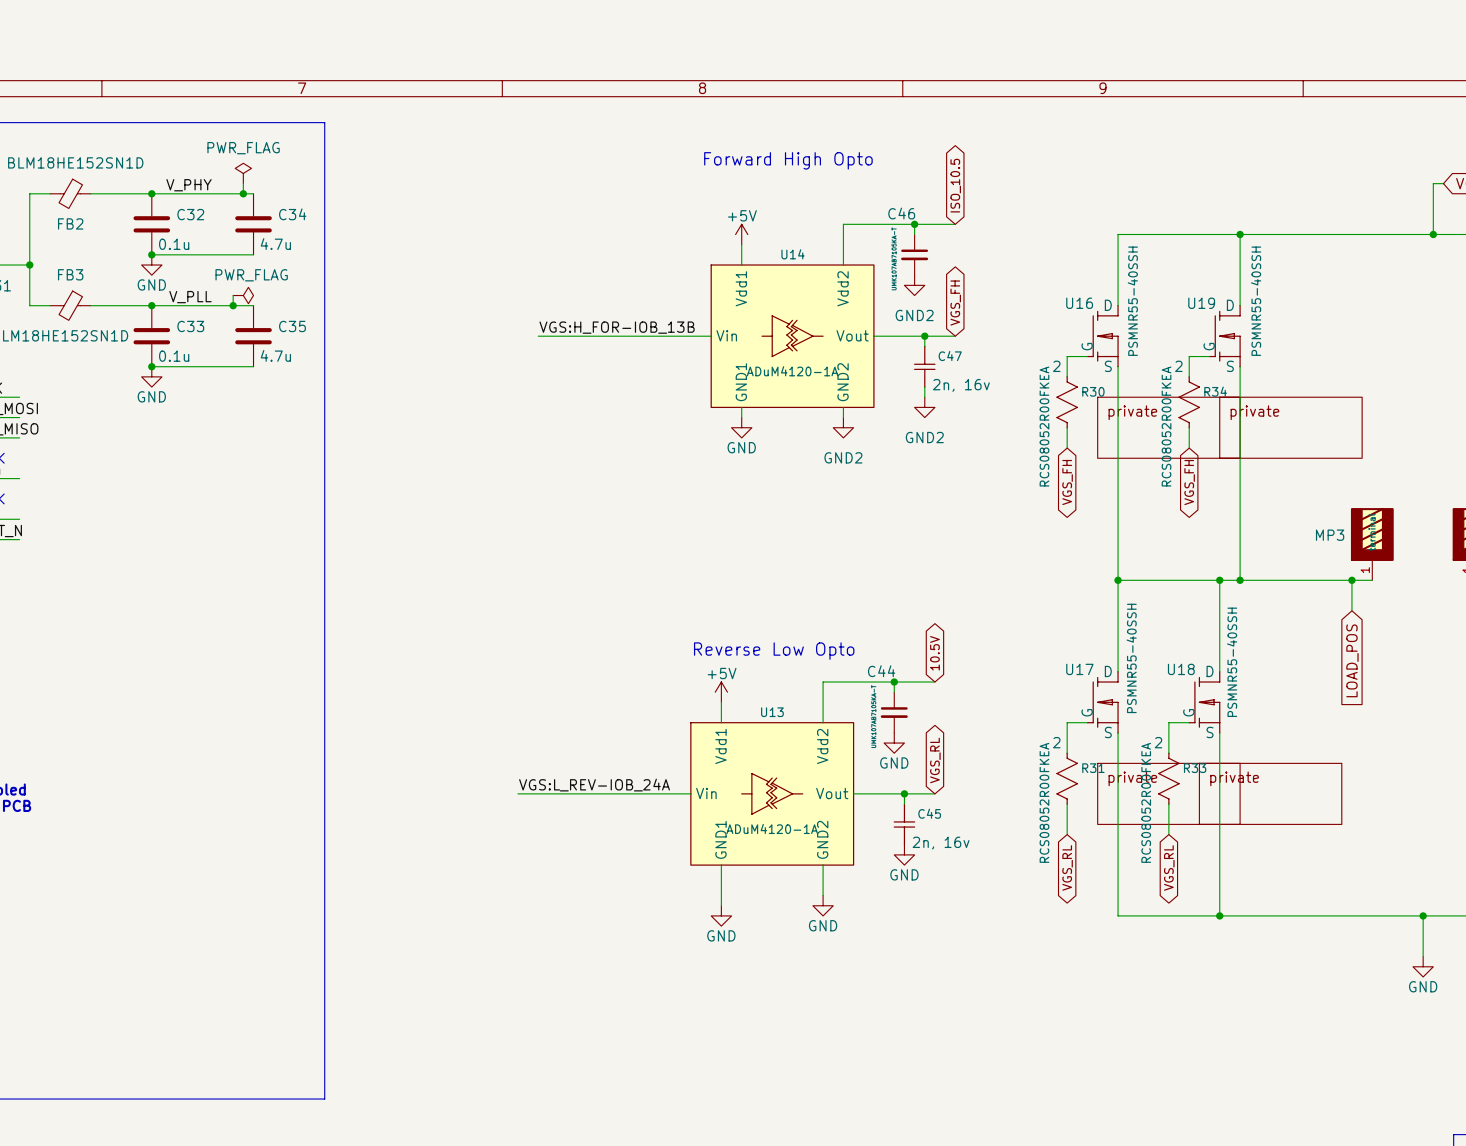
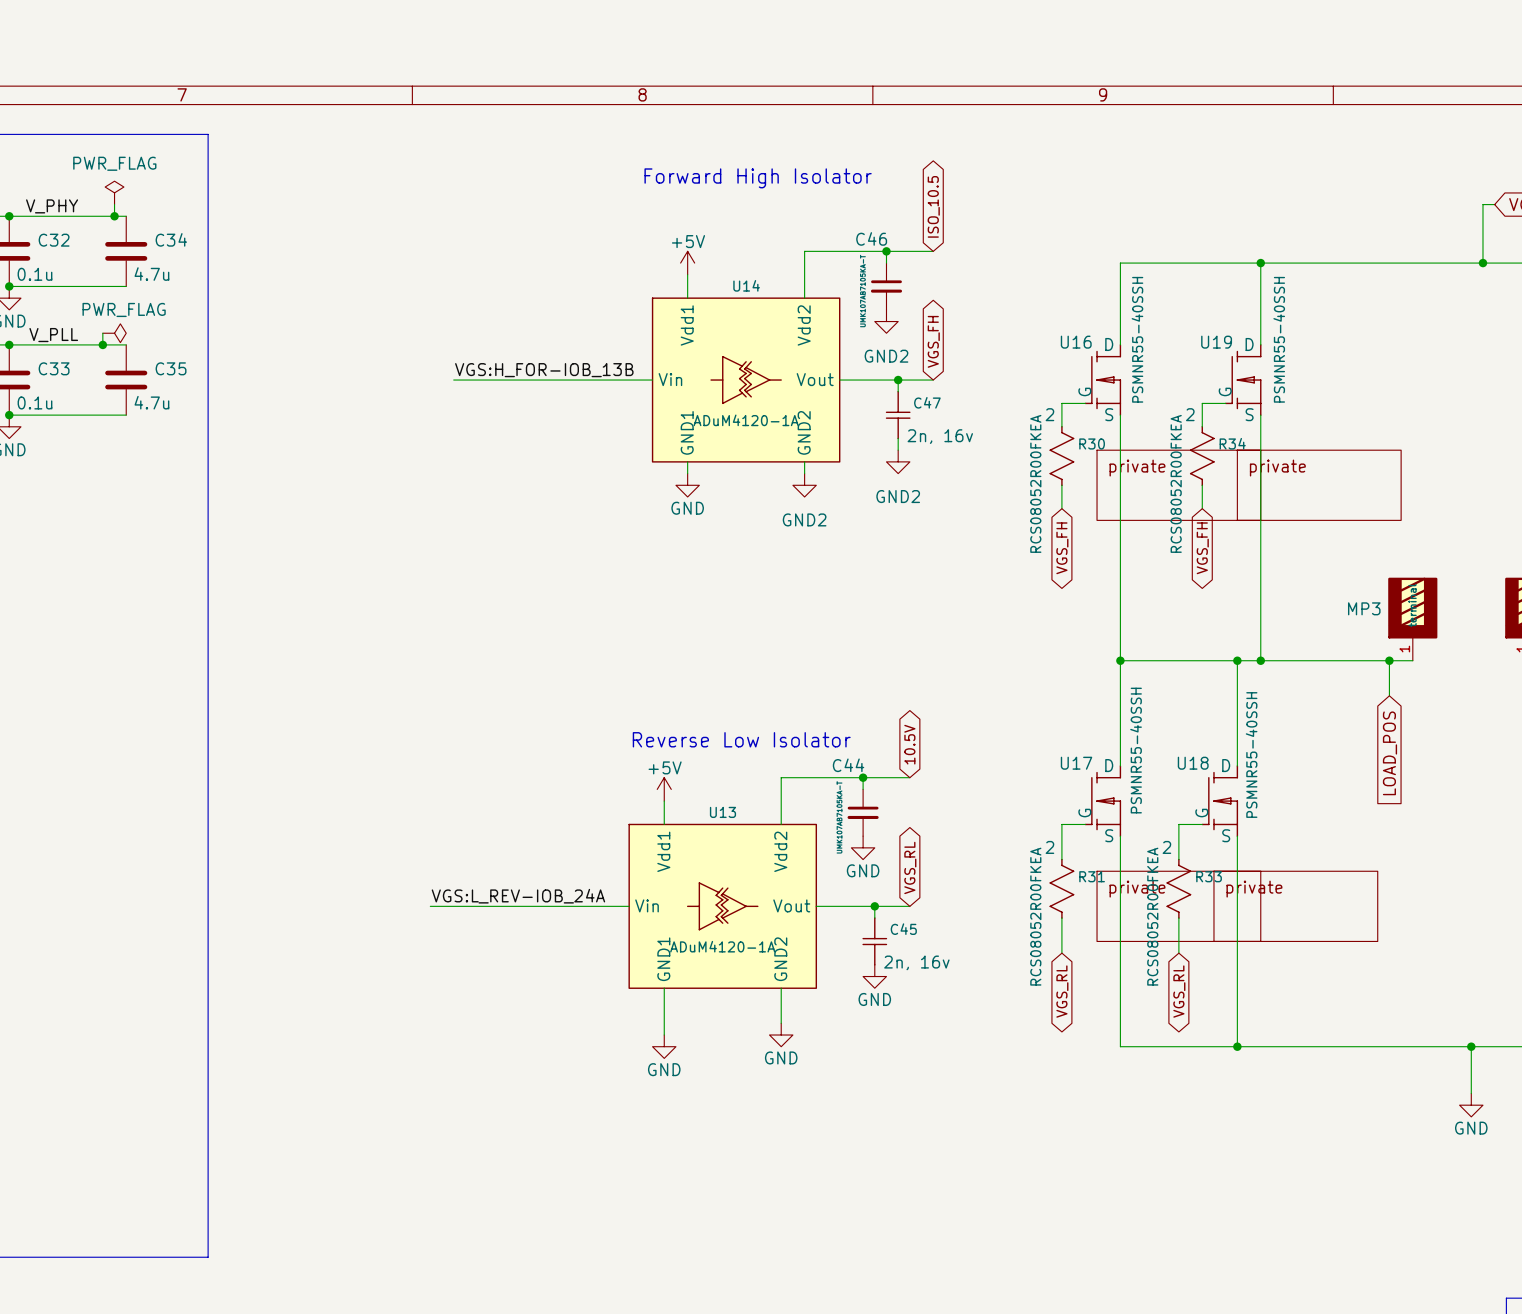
text: Forward High Opto (788, 160) -> Forward High Isolator (758, 178)
text: Reverse Low Opto (774, 651) -> Reverse Low Isolator (741, 739)

